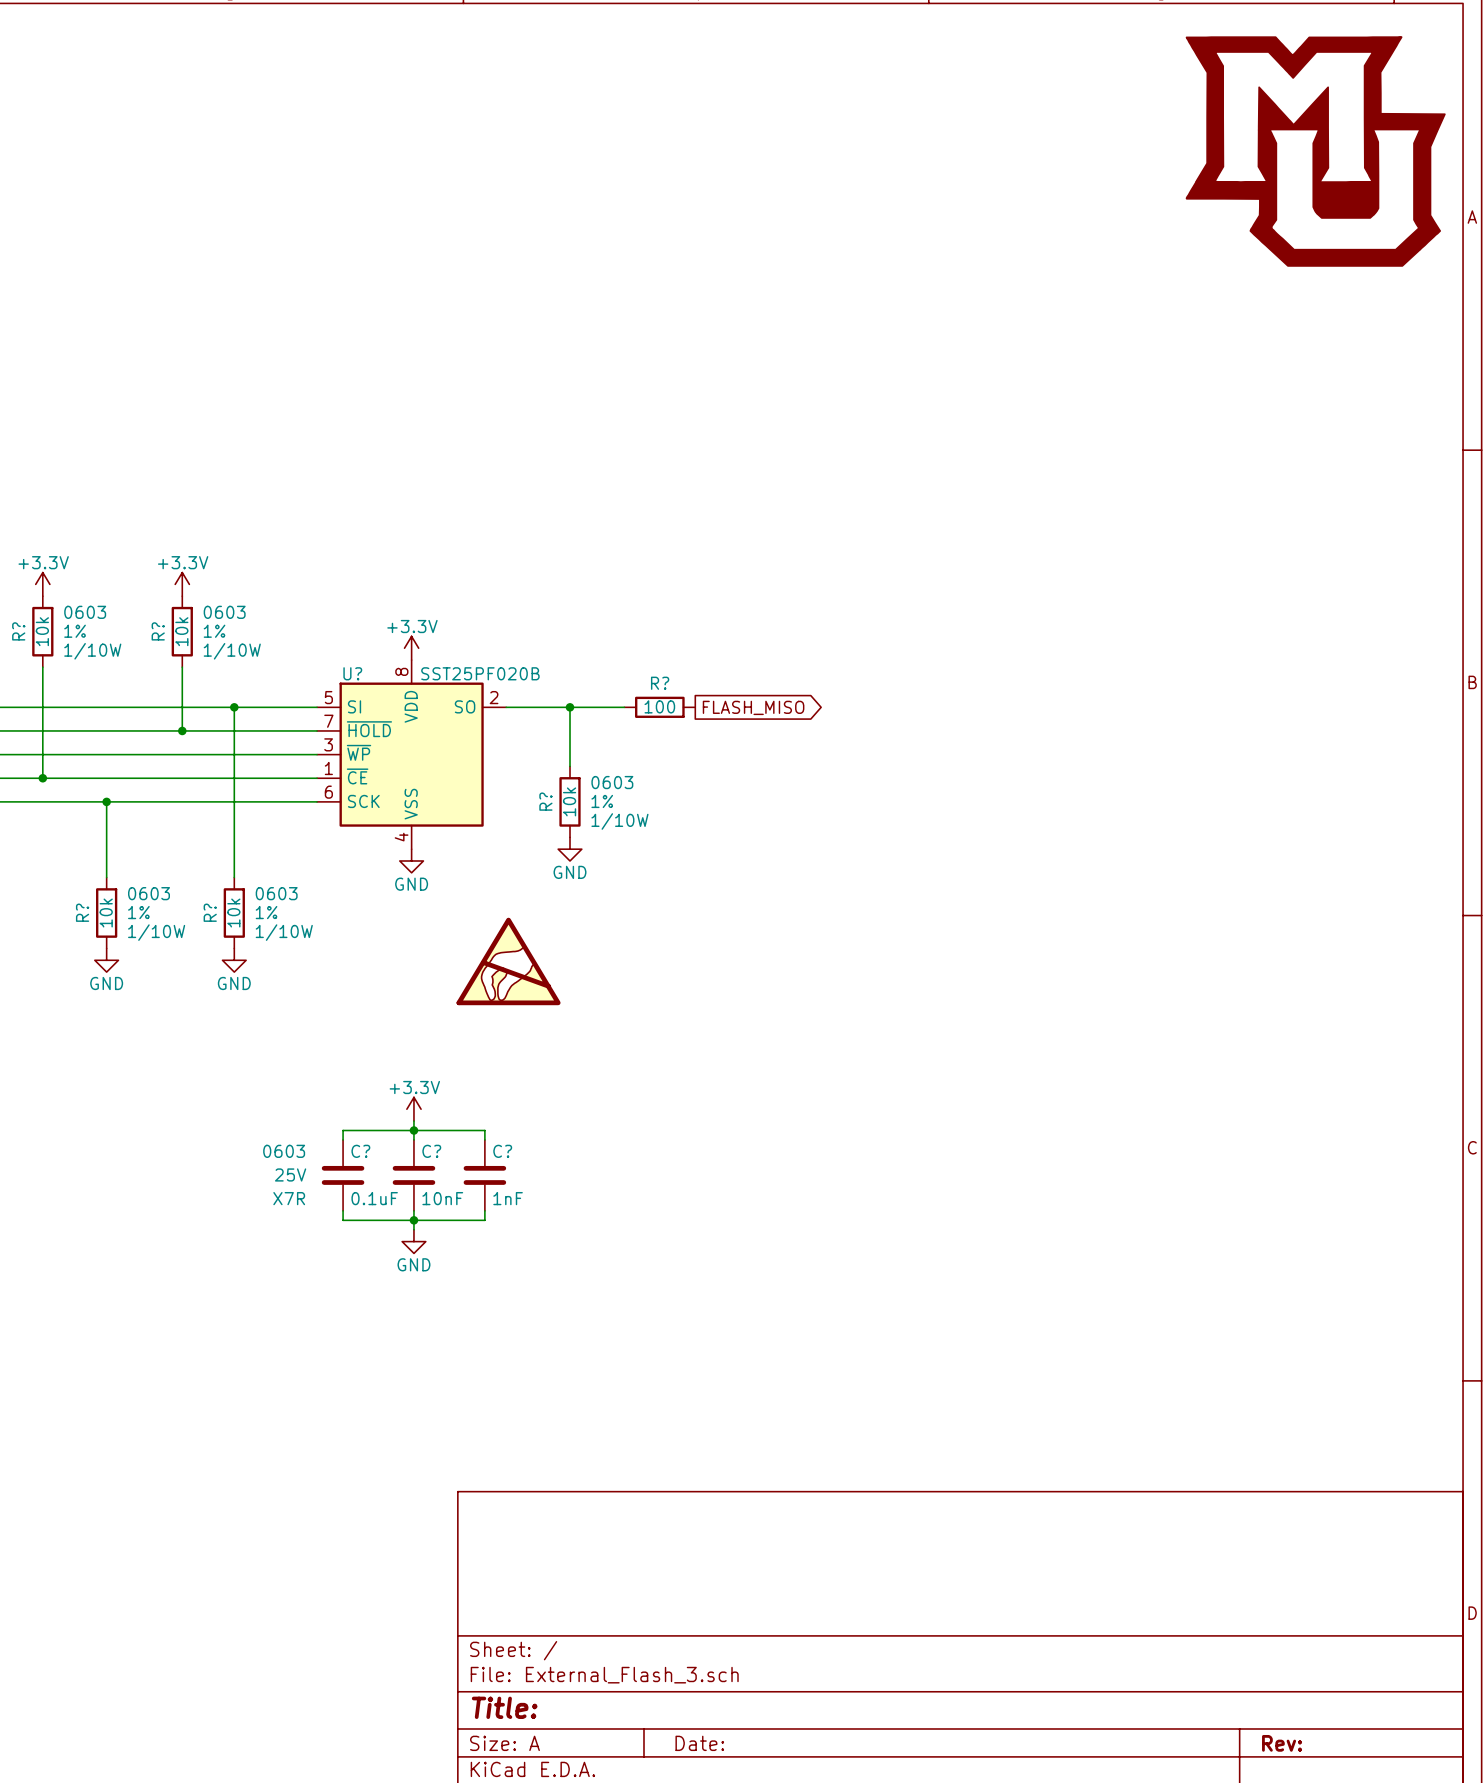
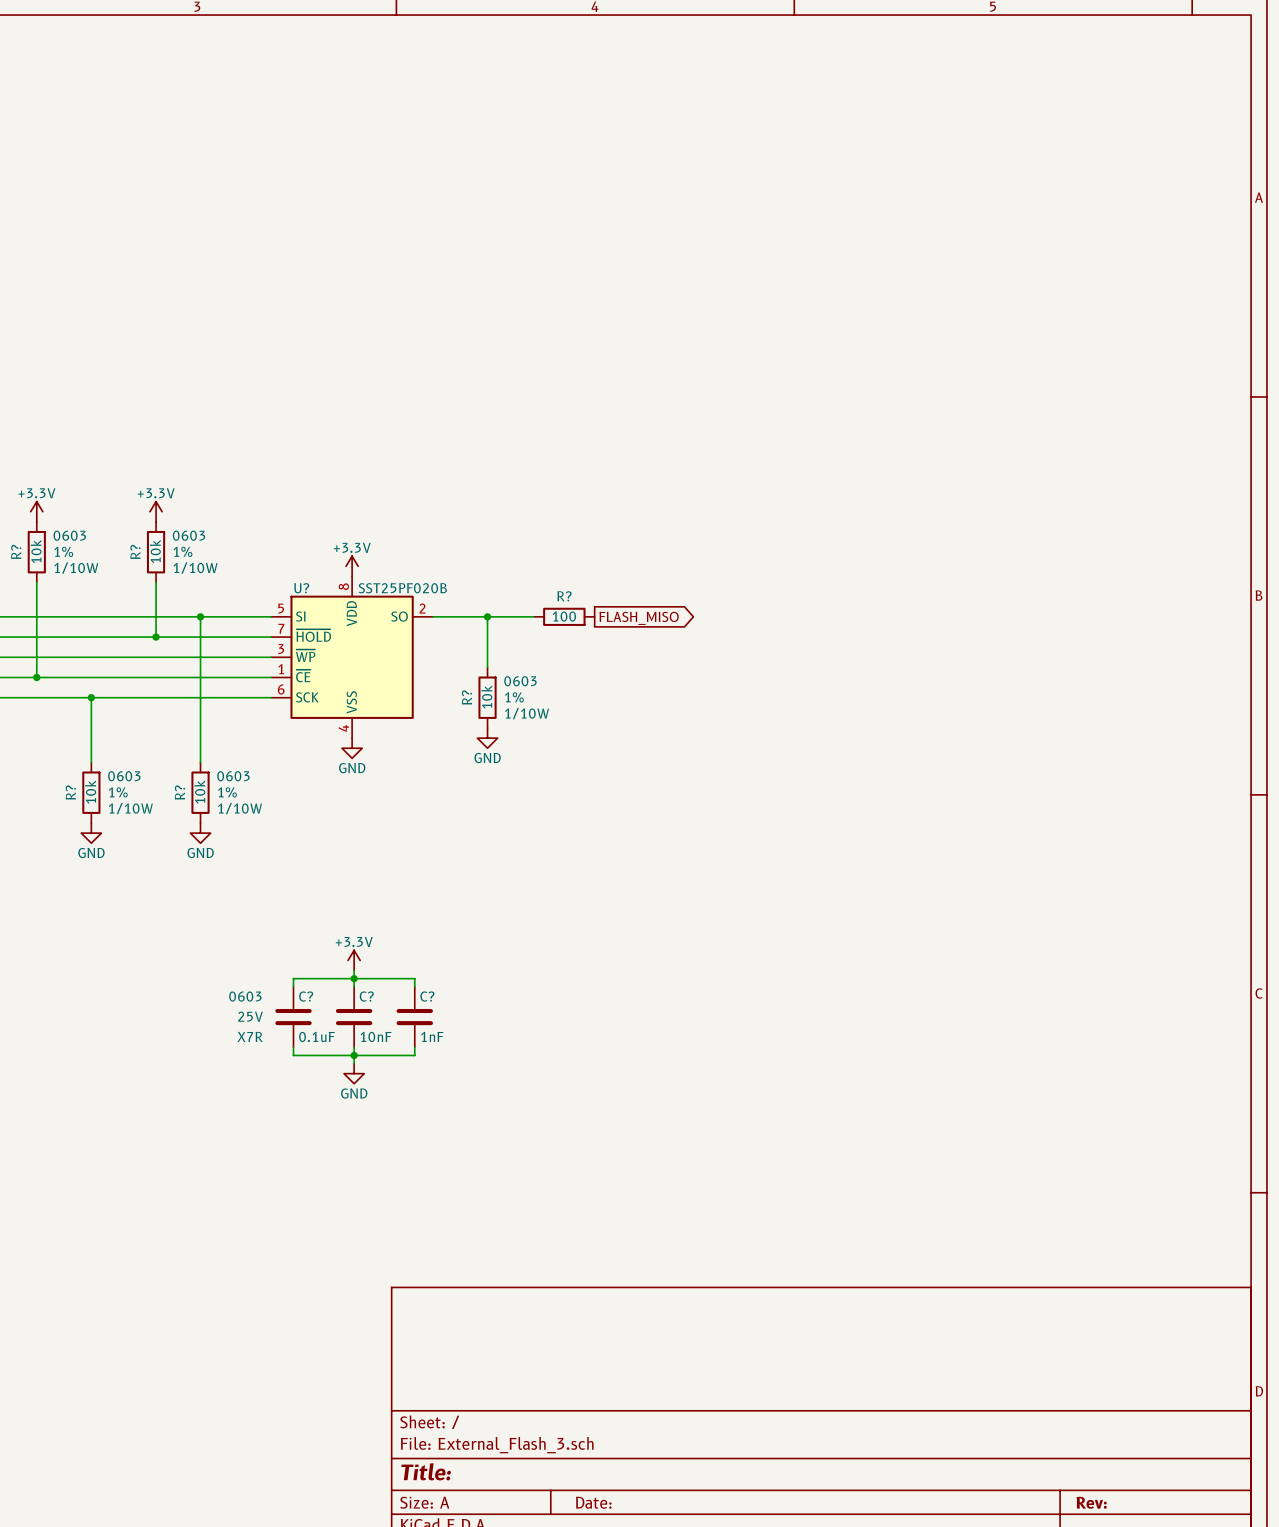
power symbol: (1315, 151) -> none
power symbol: (508, 961) -> none

